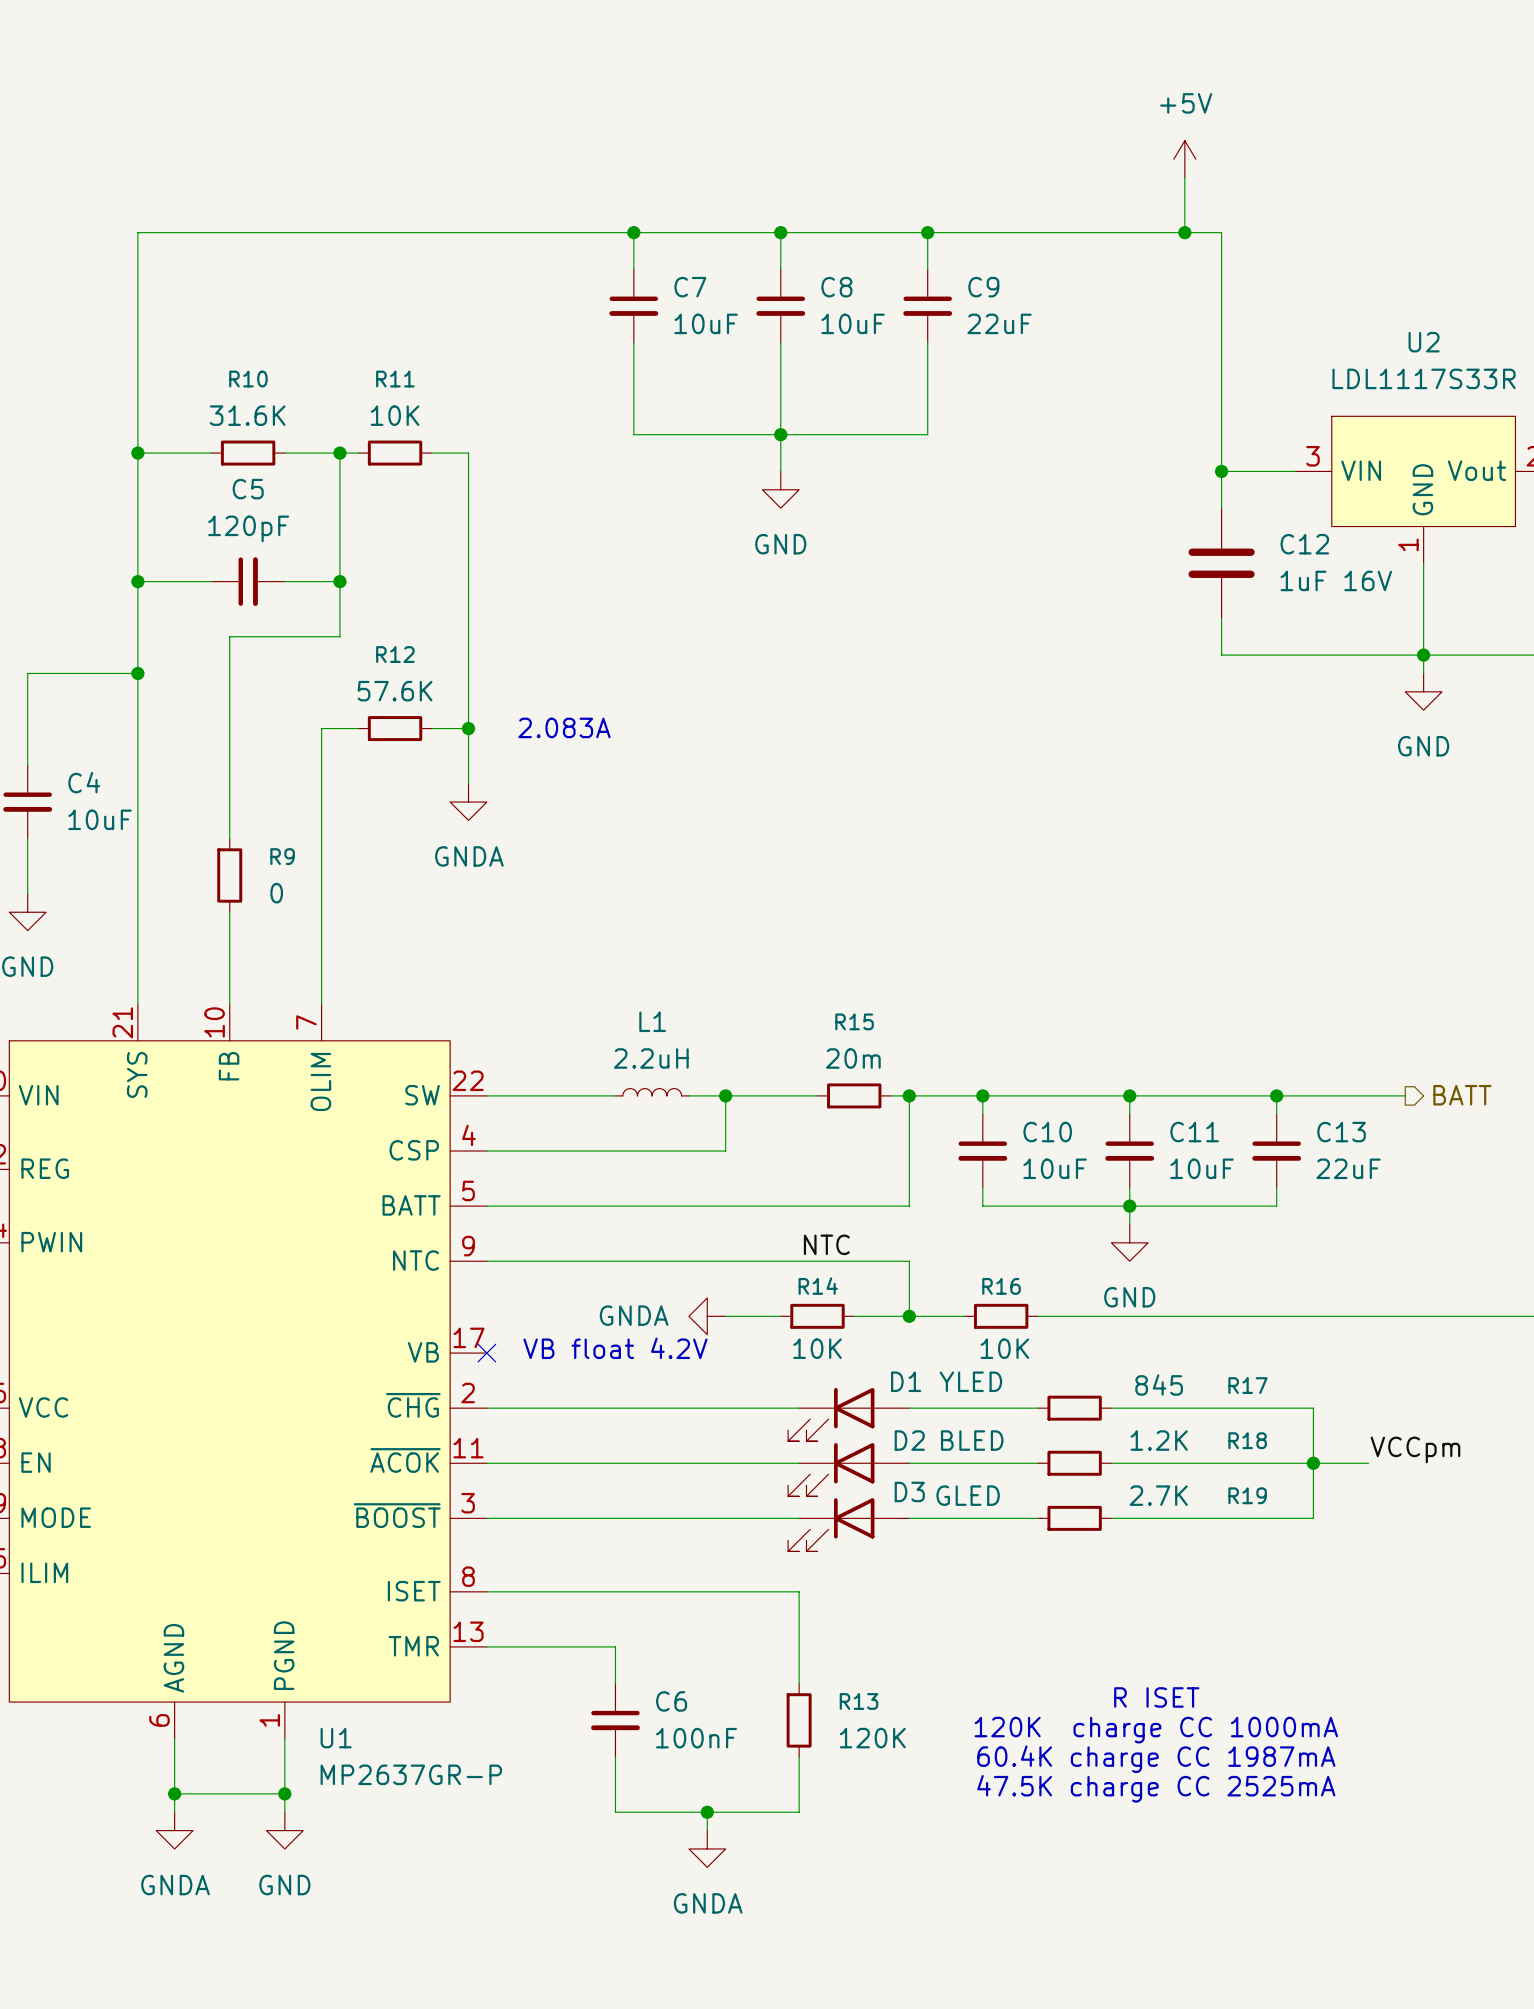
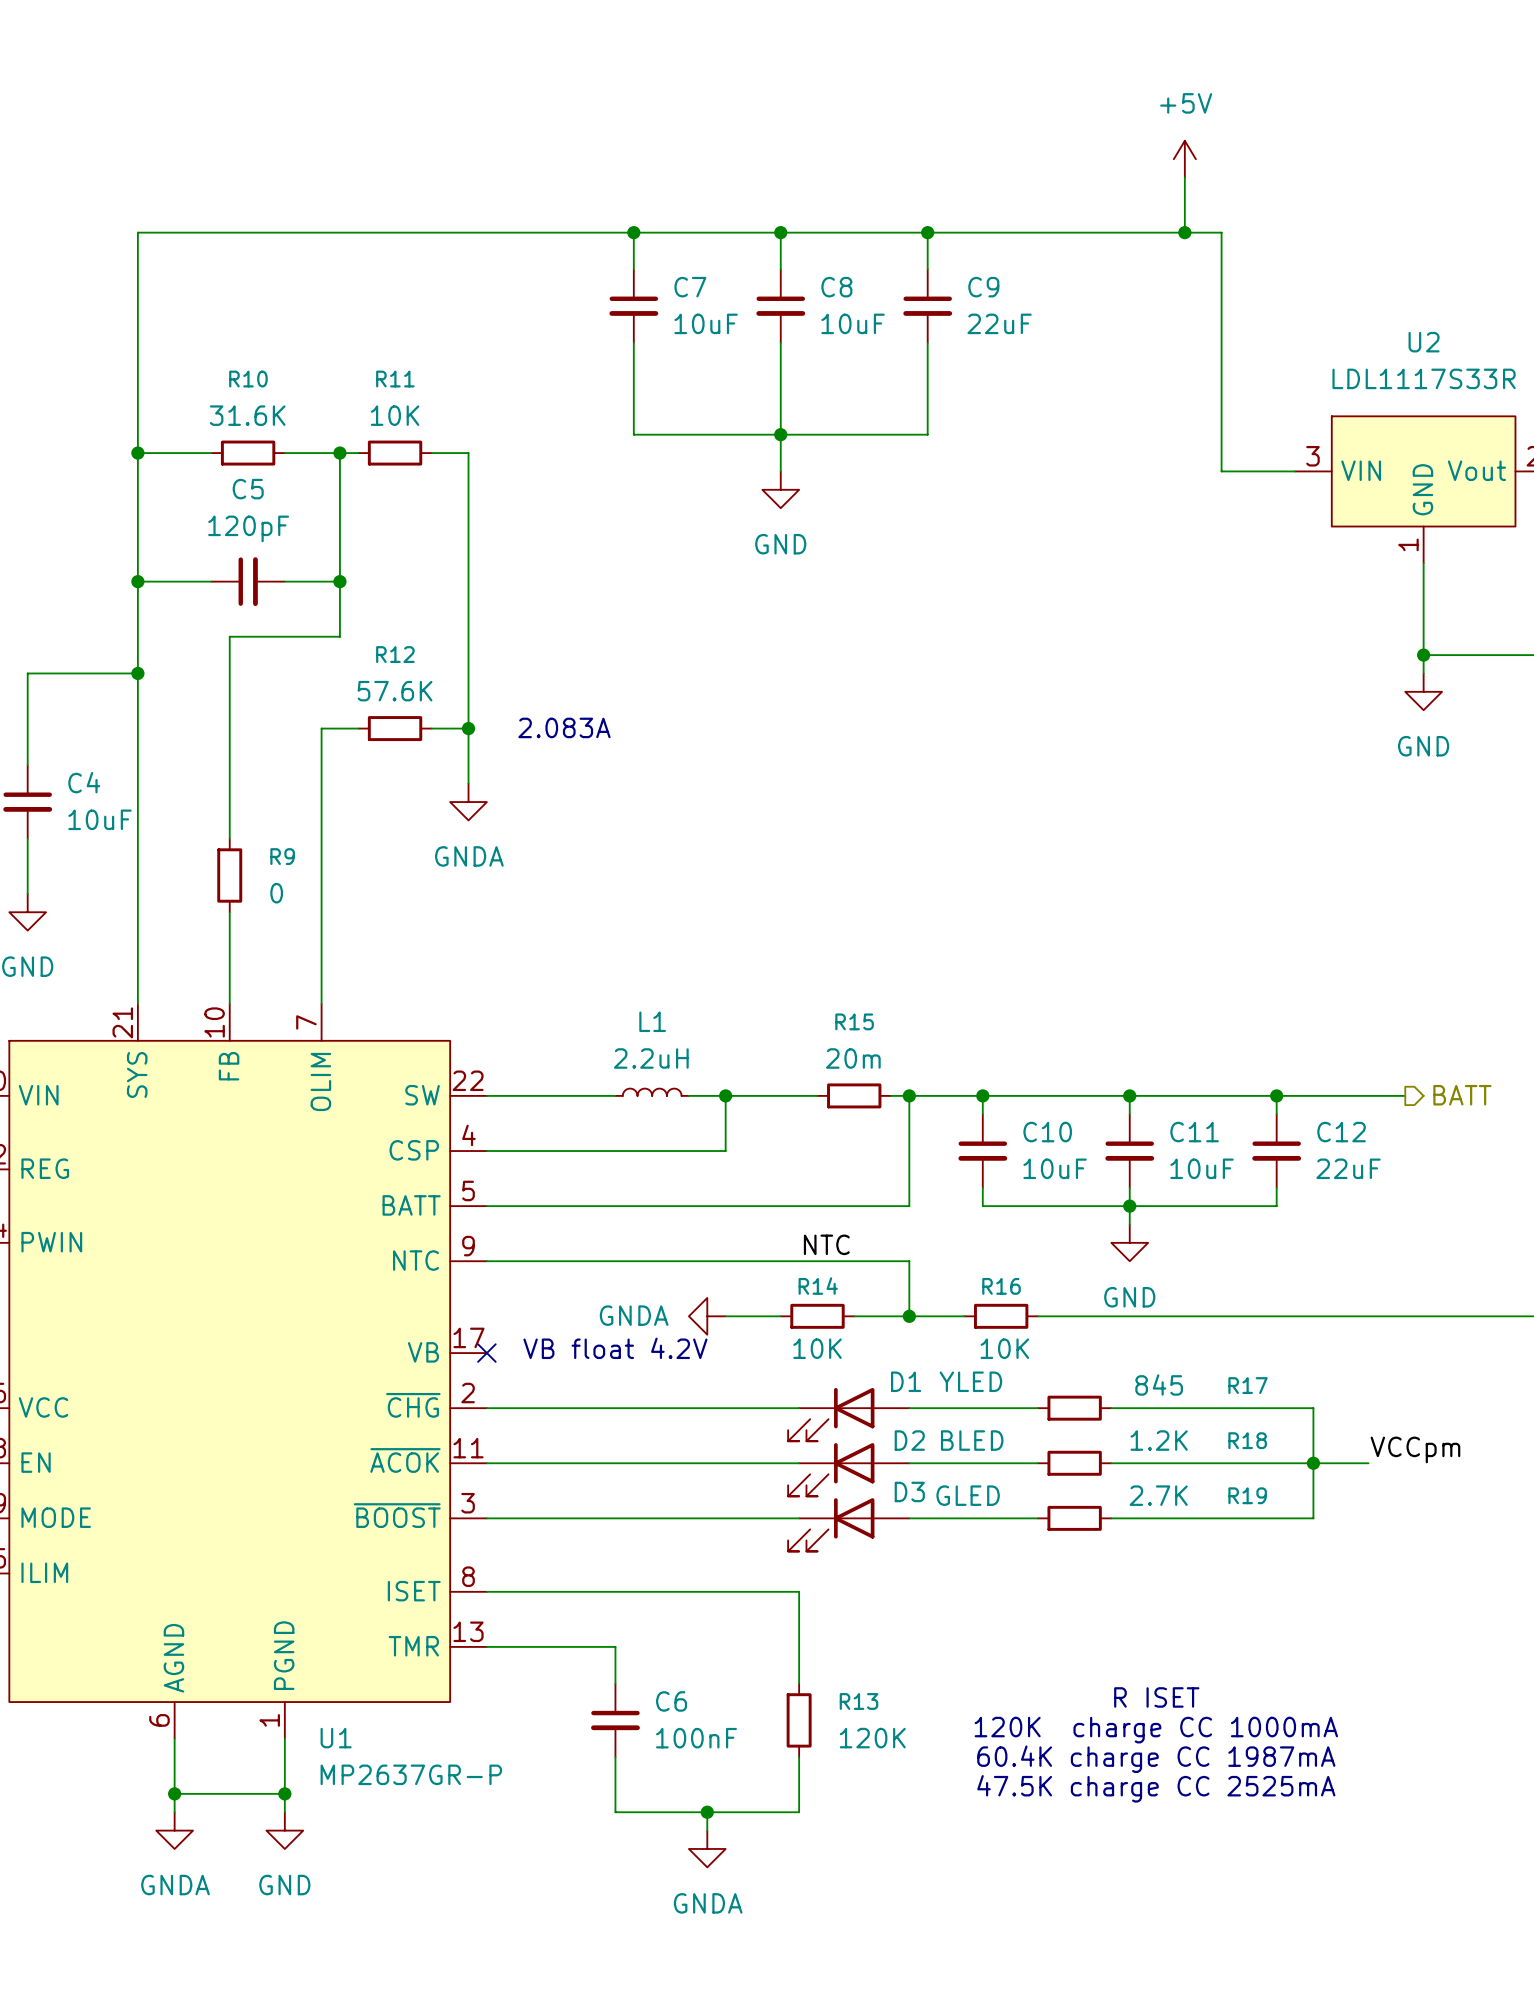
wire: (1221, 471) (1221, 508) -> none
junction: (1221, 471) -> none
C12: 1uF 16V (1221, 563) -> none
wire: (1221, 618) (1221, 655) (1423, 655) -> none
C13 name: C13 (1341, 1132) -> C12 (1341, 1132)

